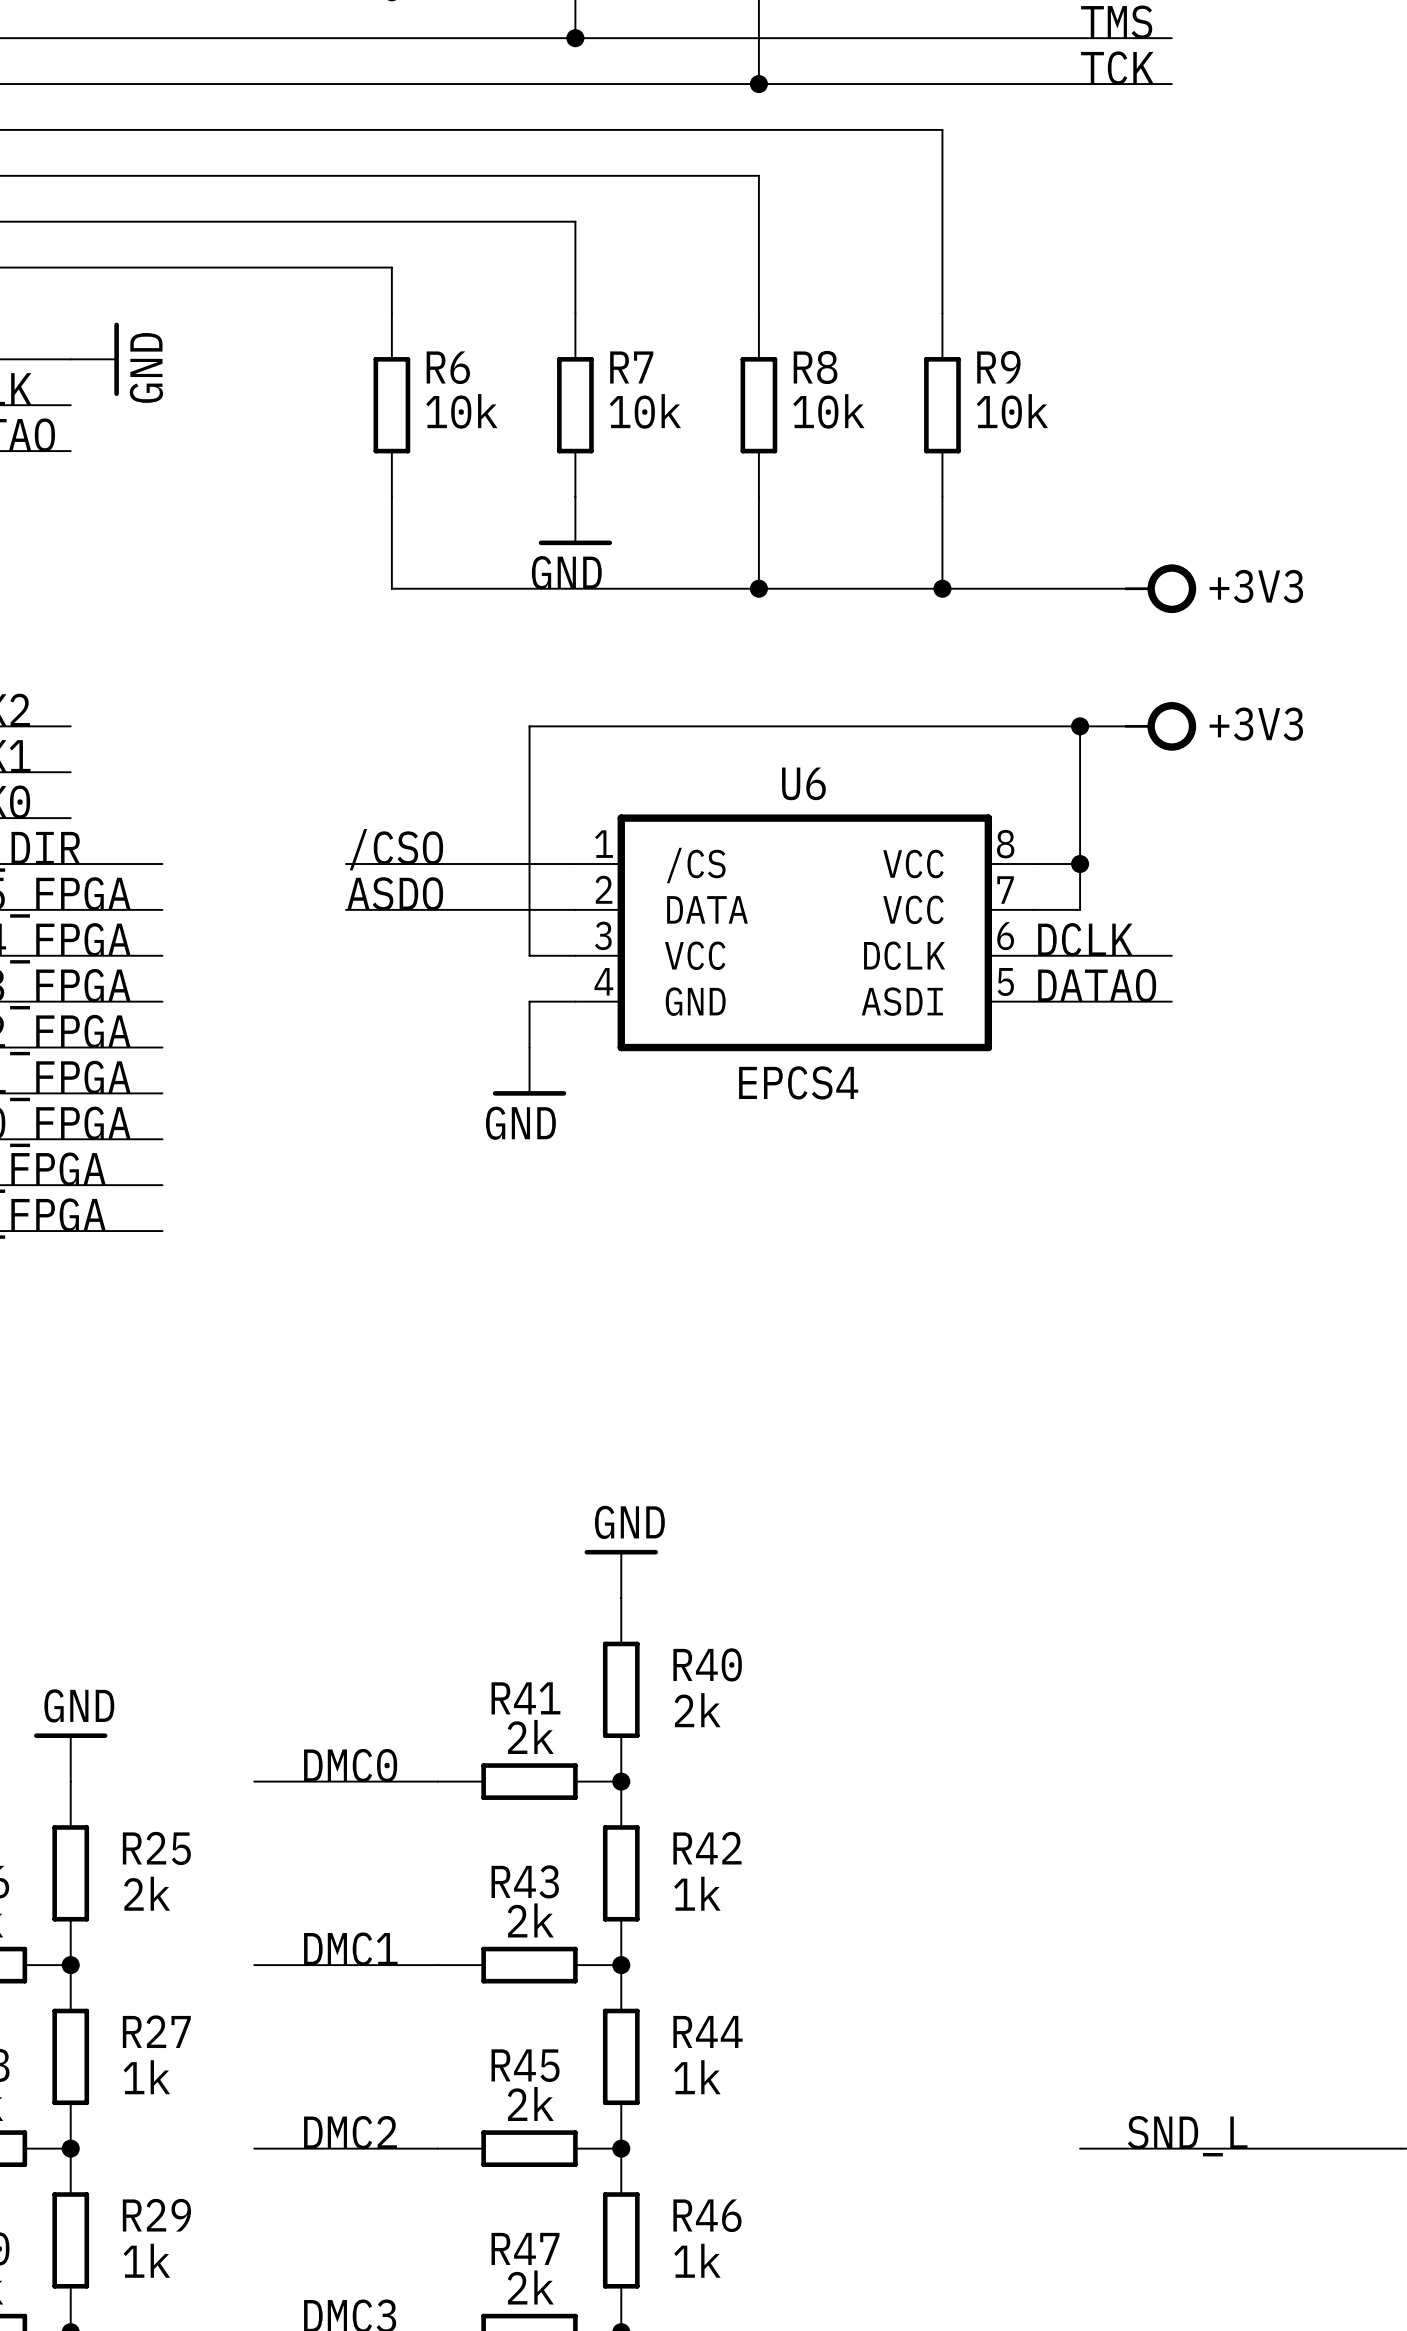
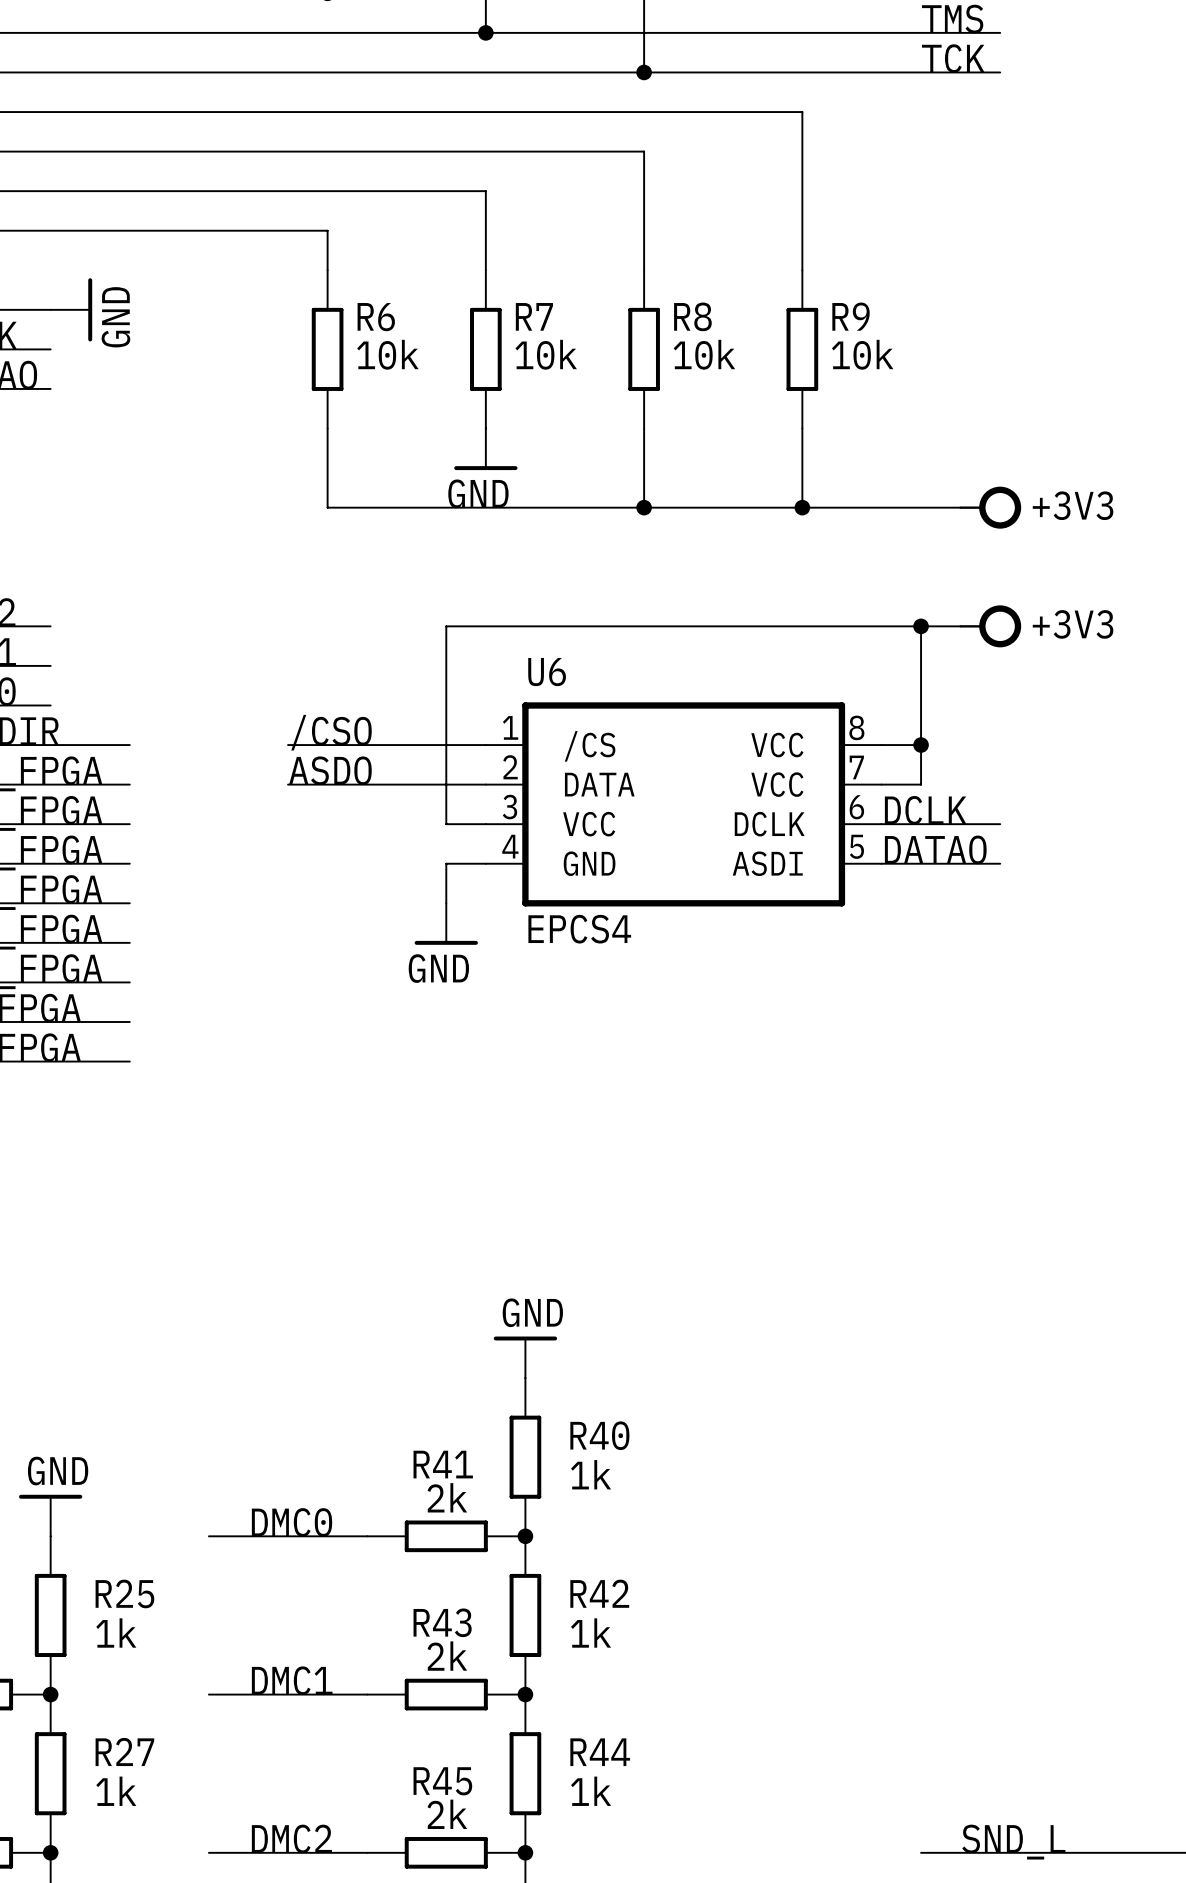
U6 name position: U6 (803, 783) -> U6 (547, 672)
U6 value position: EPCS4 (798, 1082) -> EPCS4 (579, 929)
R40 value: 2k (697, 1710) -> 1k (591, 1474)
R25 value: 2k (147, 1893) -> 1k (116, 1633)

